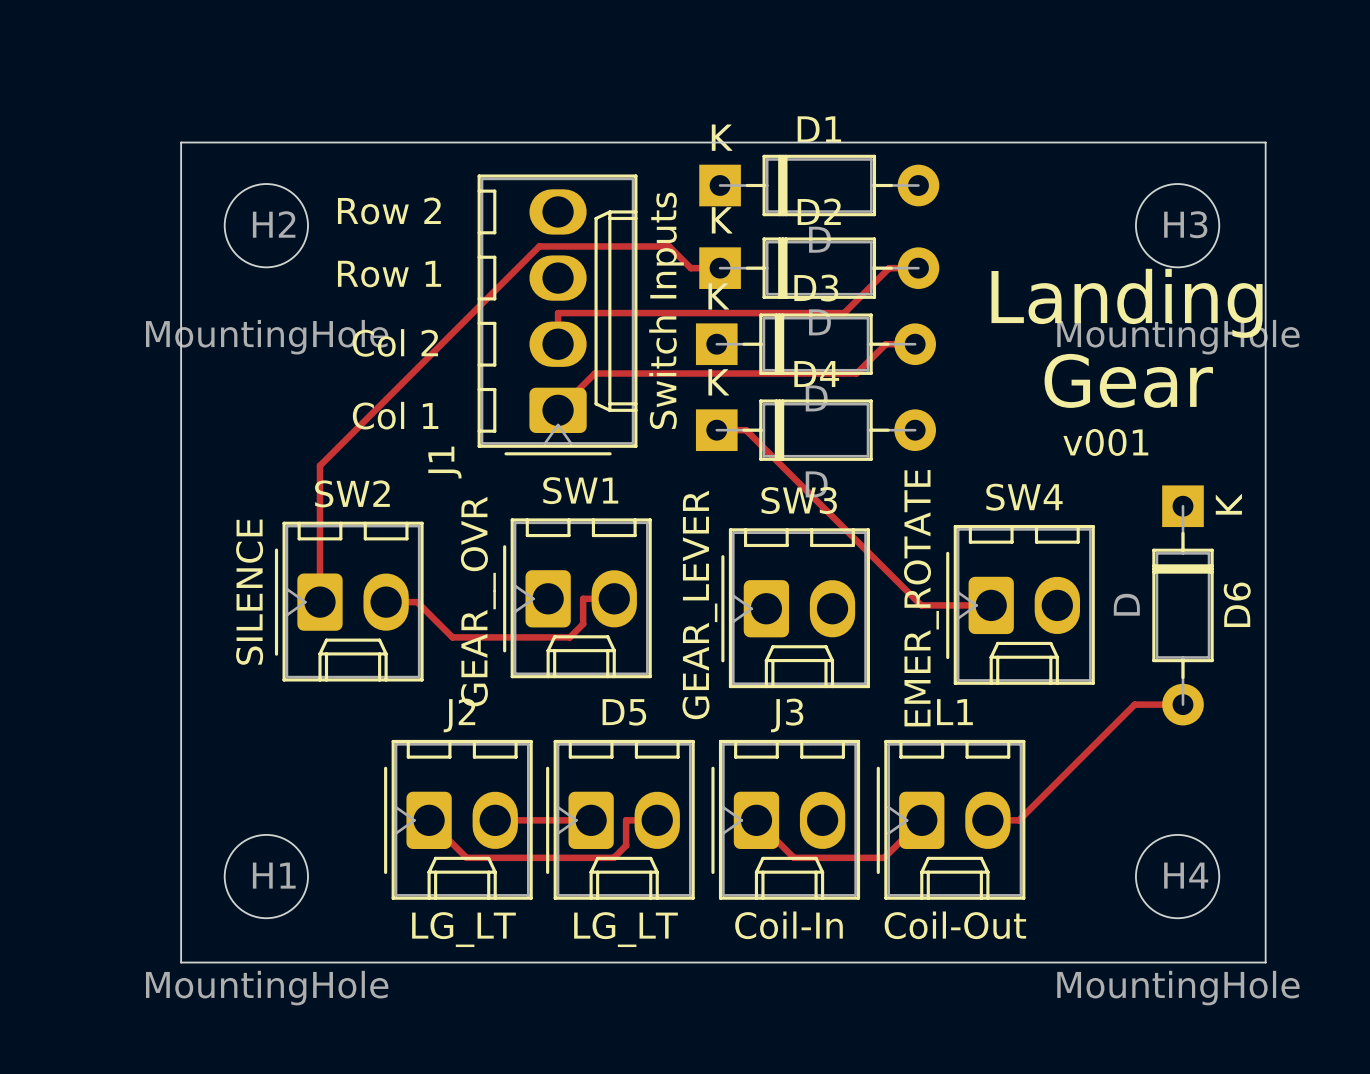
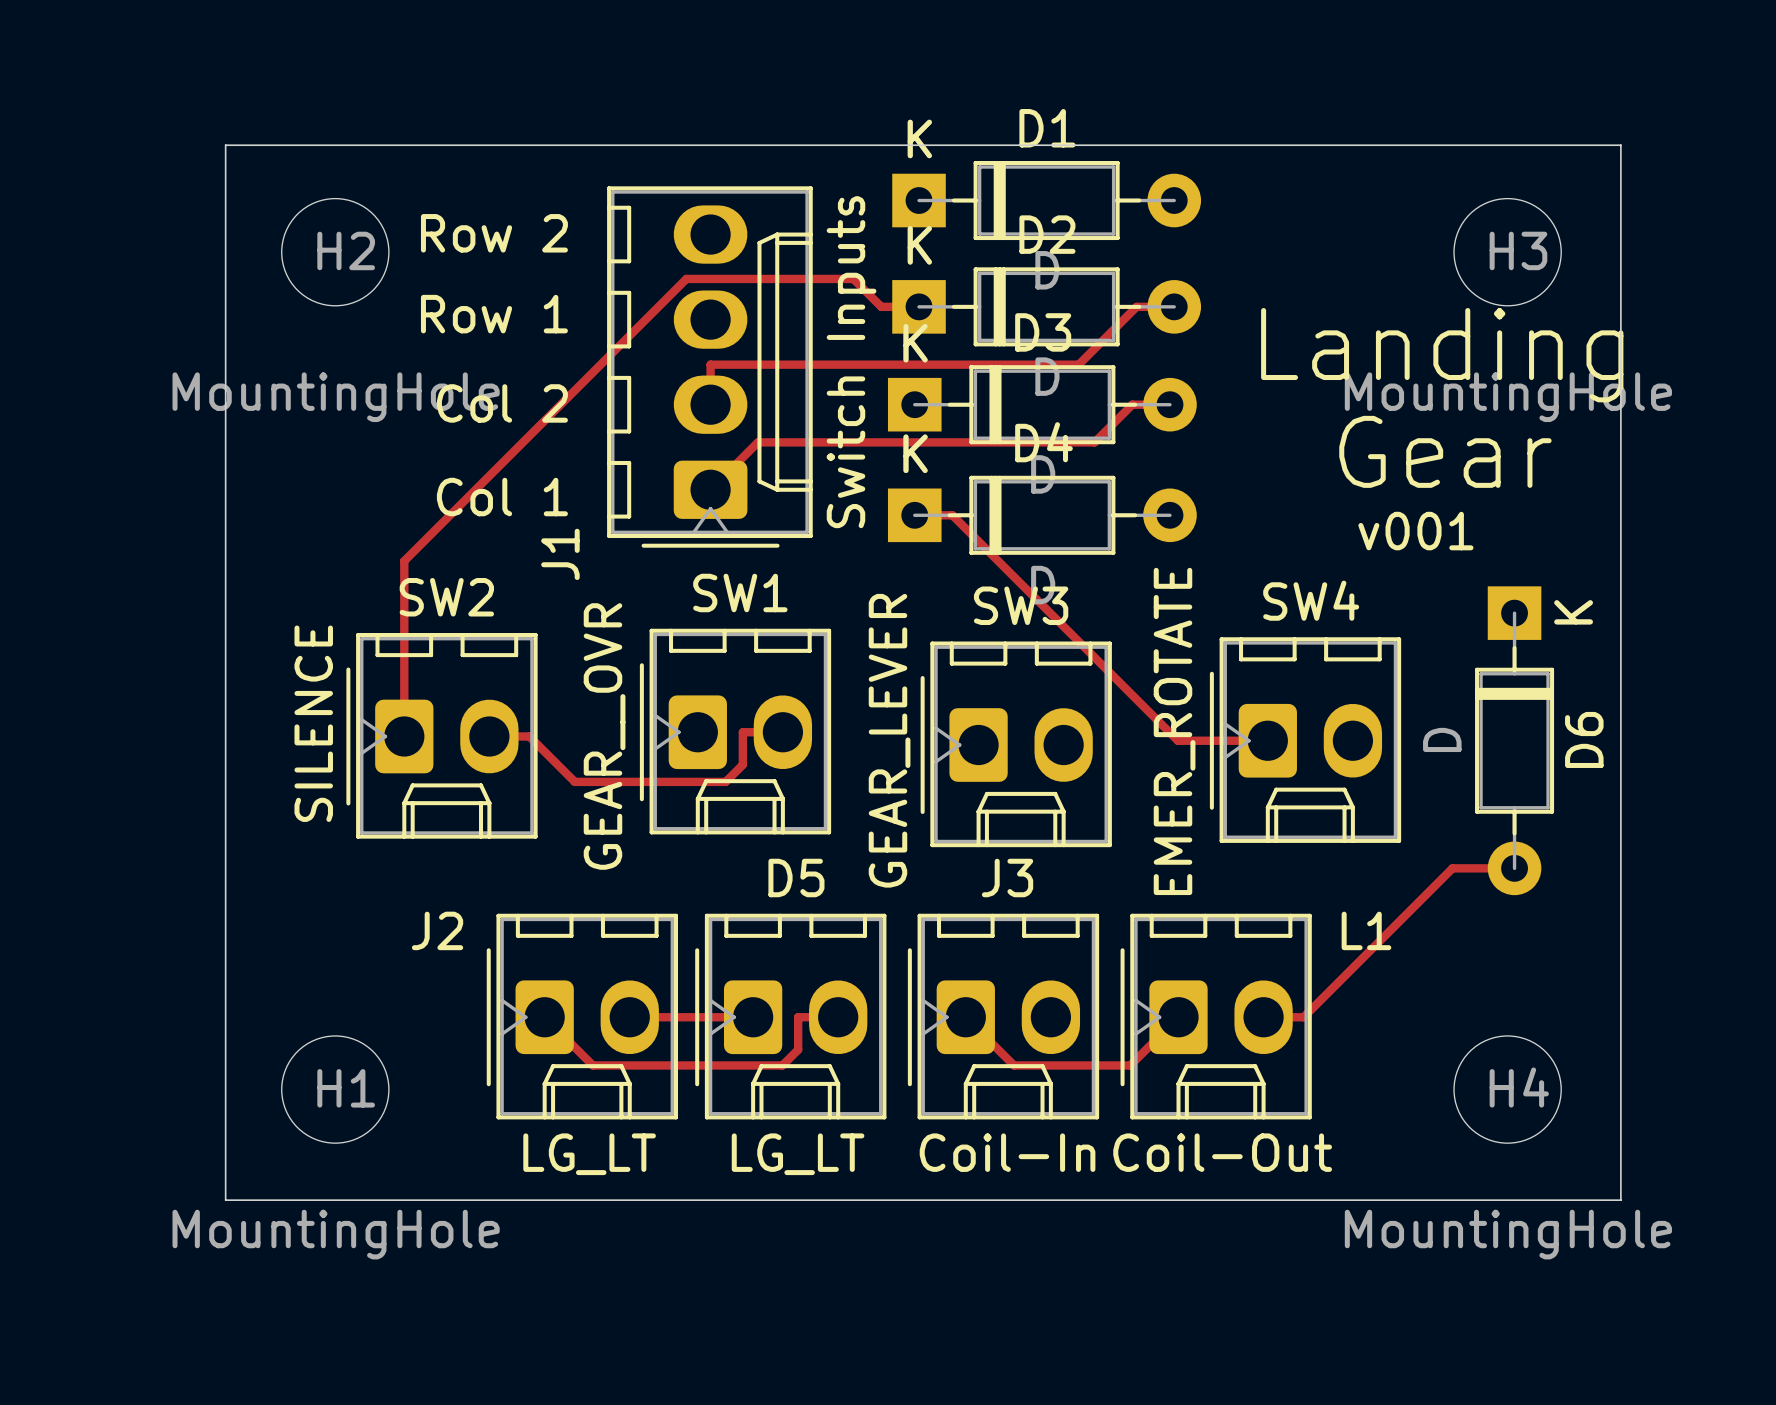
L1 name position: L1 (954, 712) -> L1 (1366, 930)
J2 name position: J2 (459, 715) -> J2 (437, 930)

